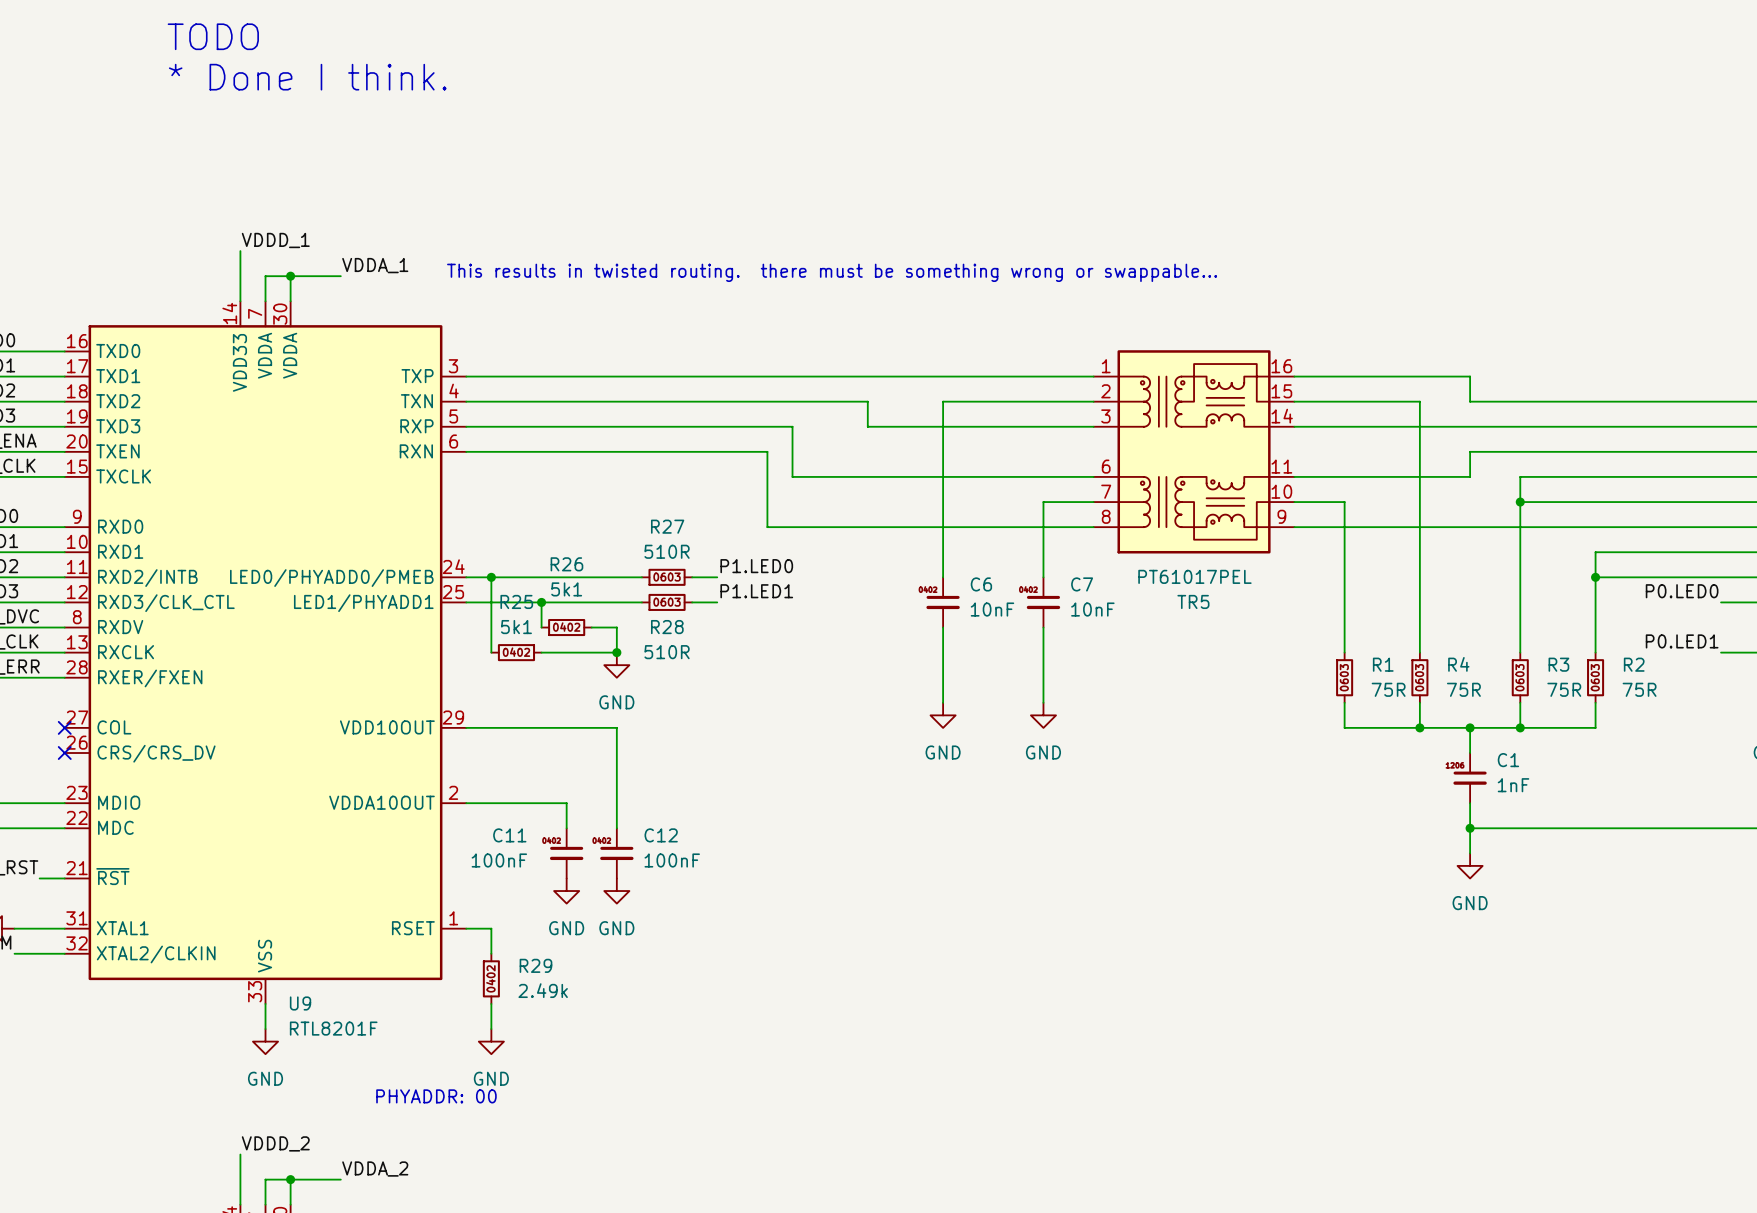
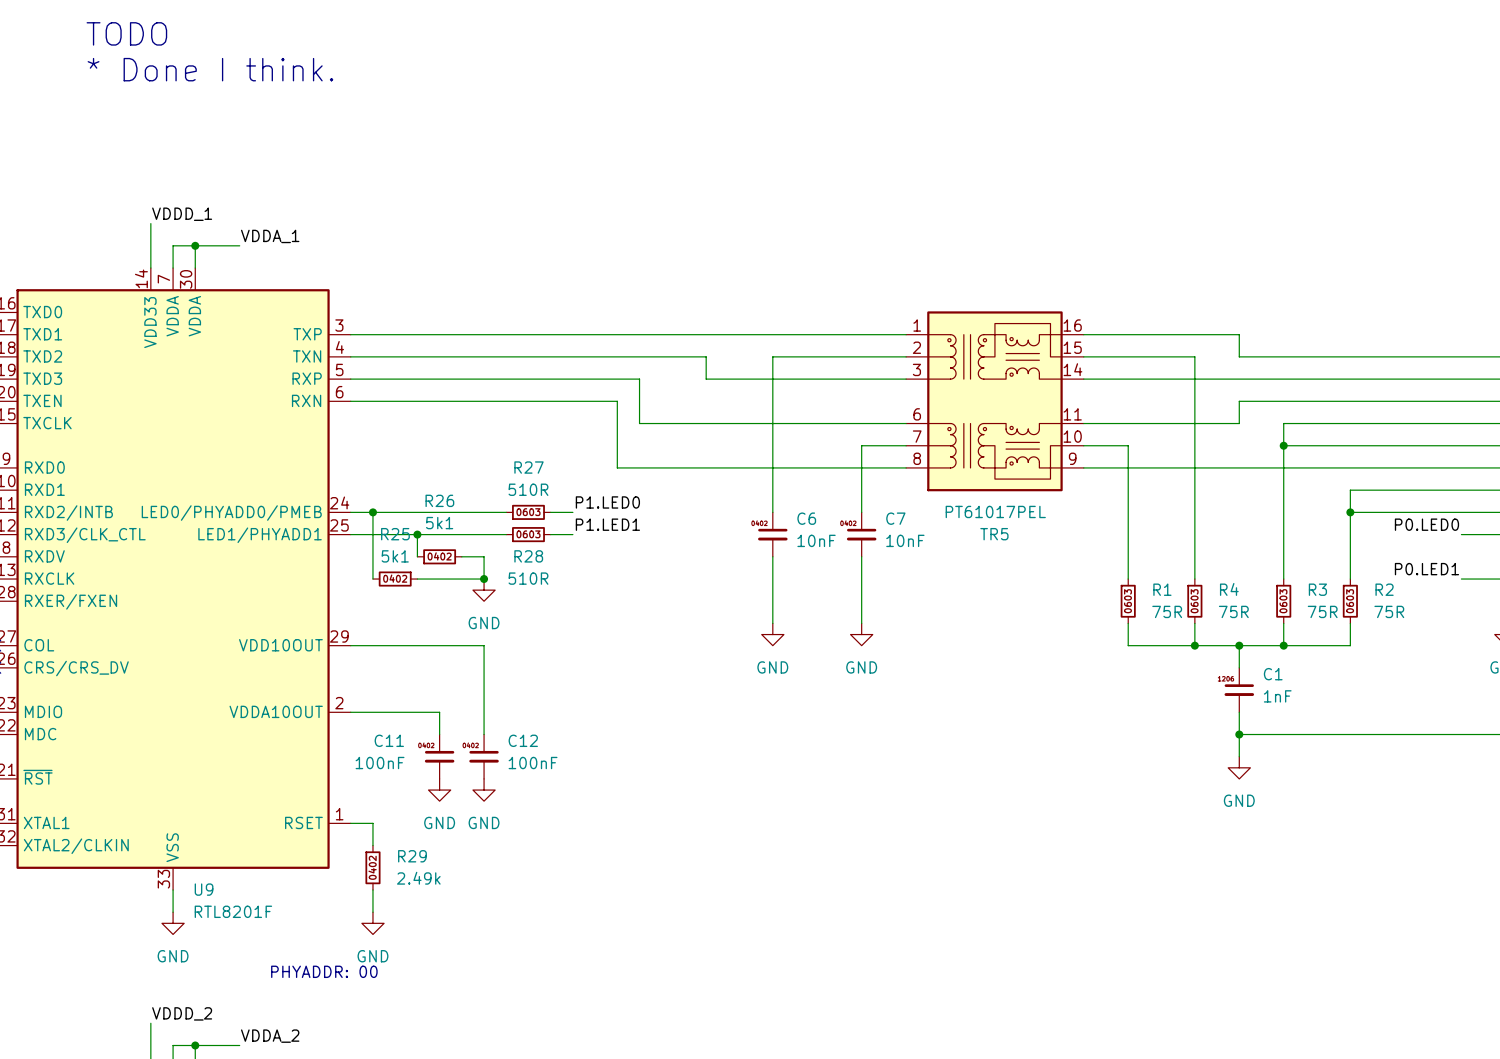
text: This results in twisted routing. there must be something wrong or swappable... (832, 272) -> none

